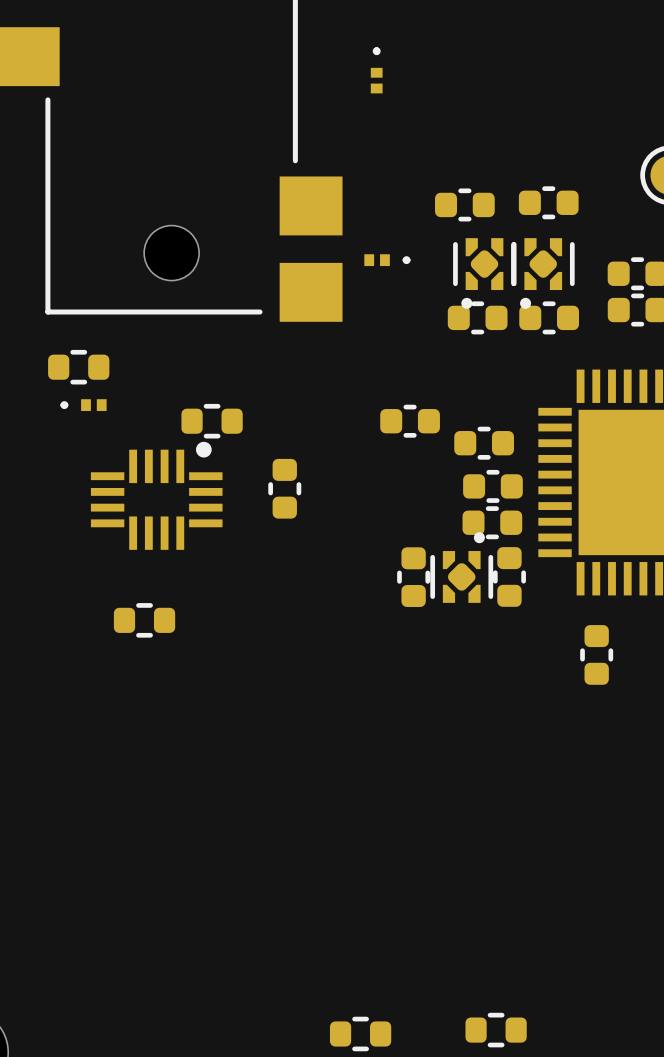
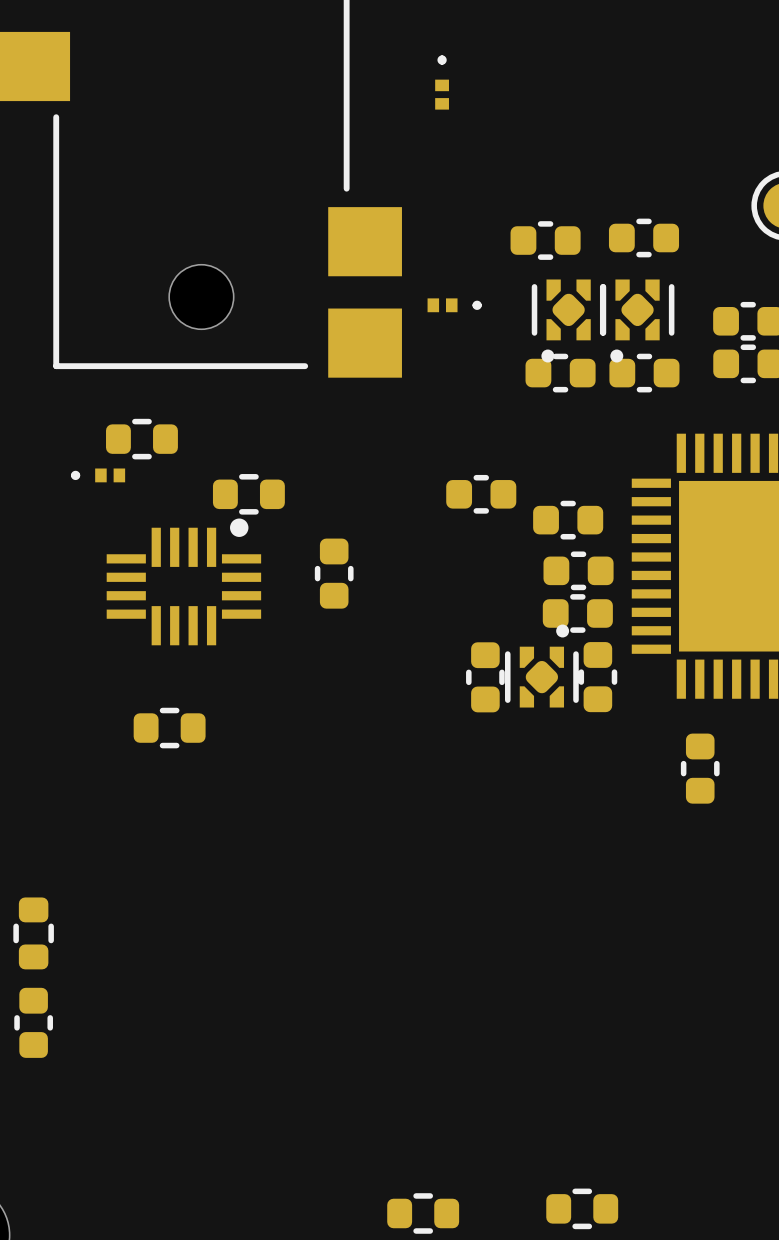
part position: (78, 367) -> (141, 439)
part: none -> (33, 933)
part: none -> (33, 1022)

